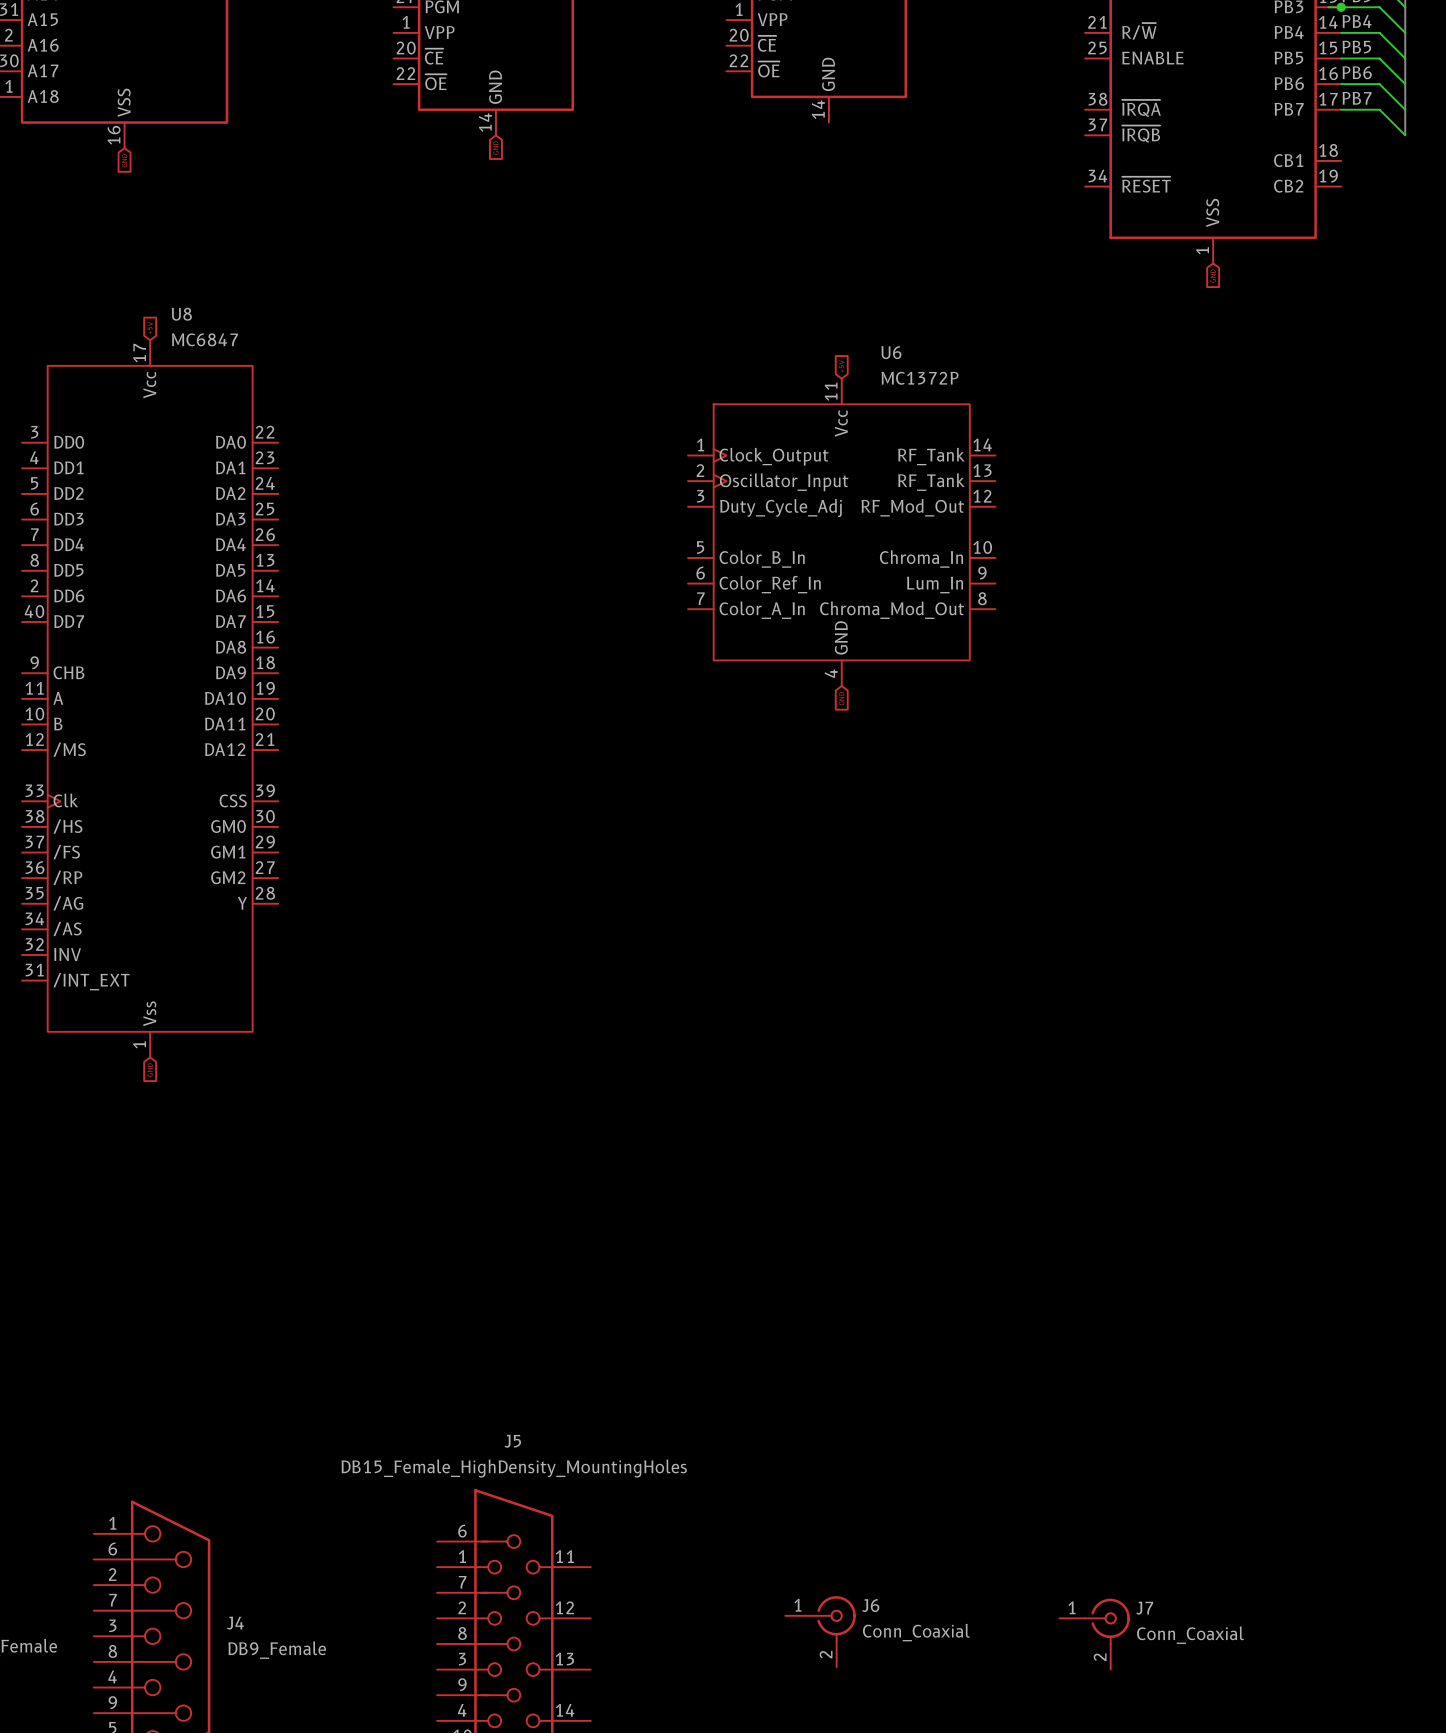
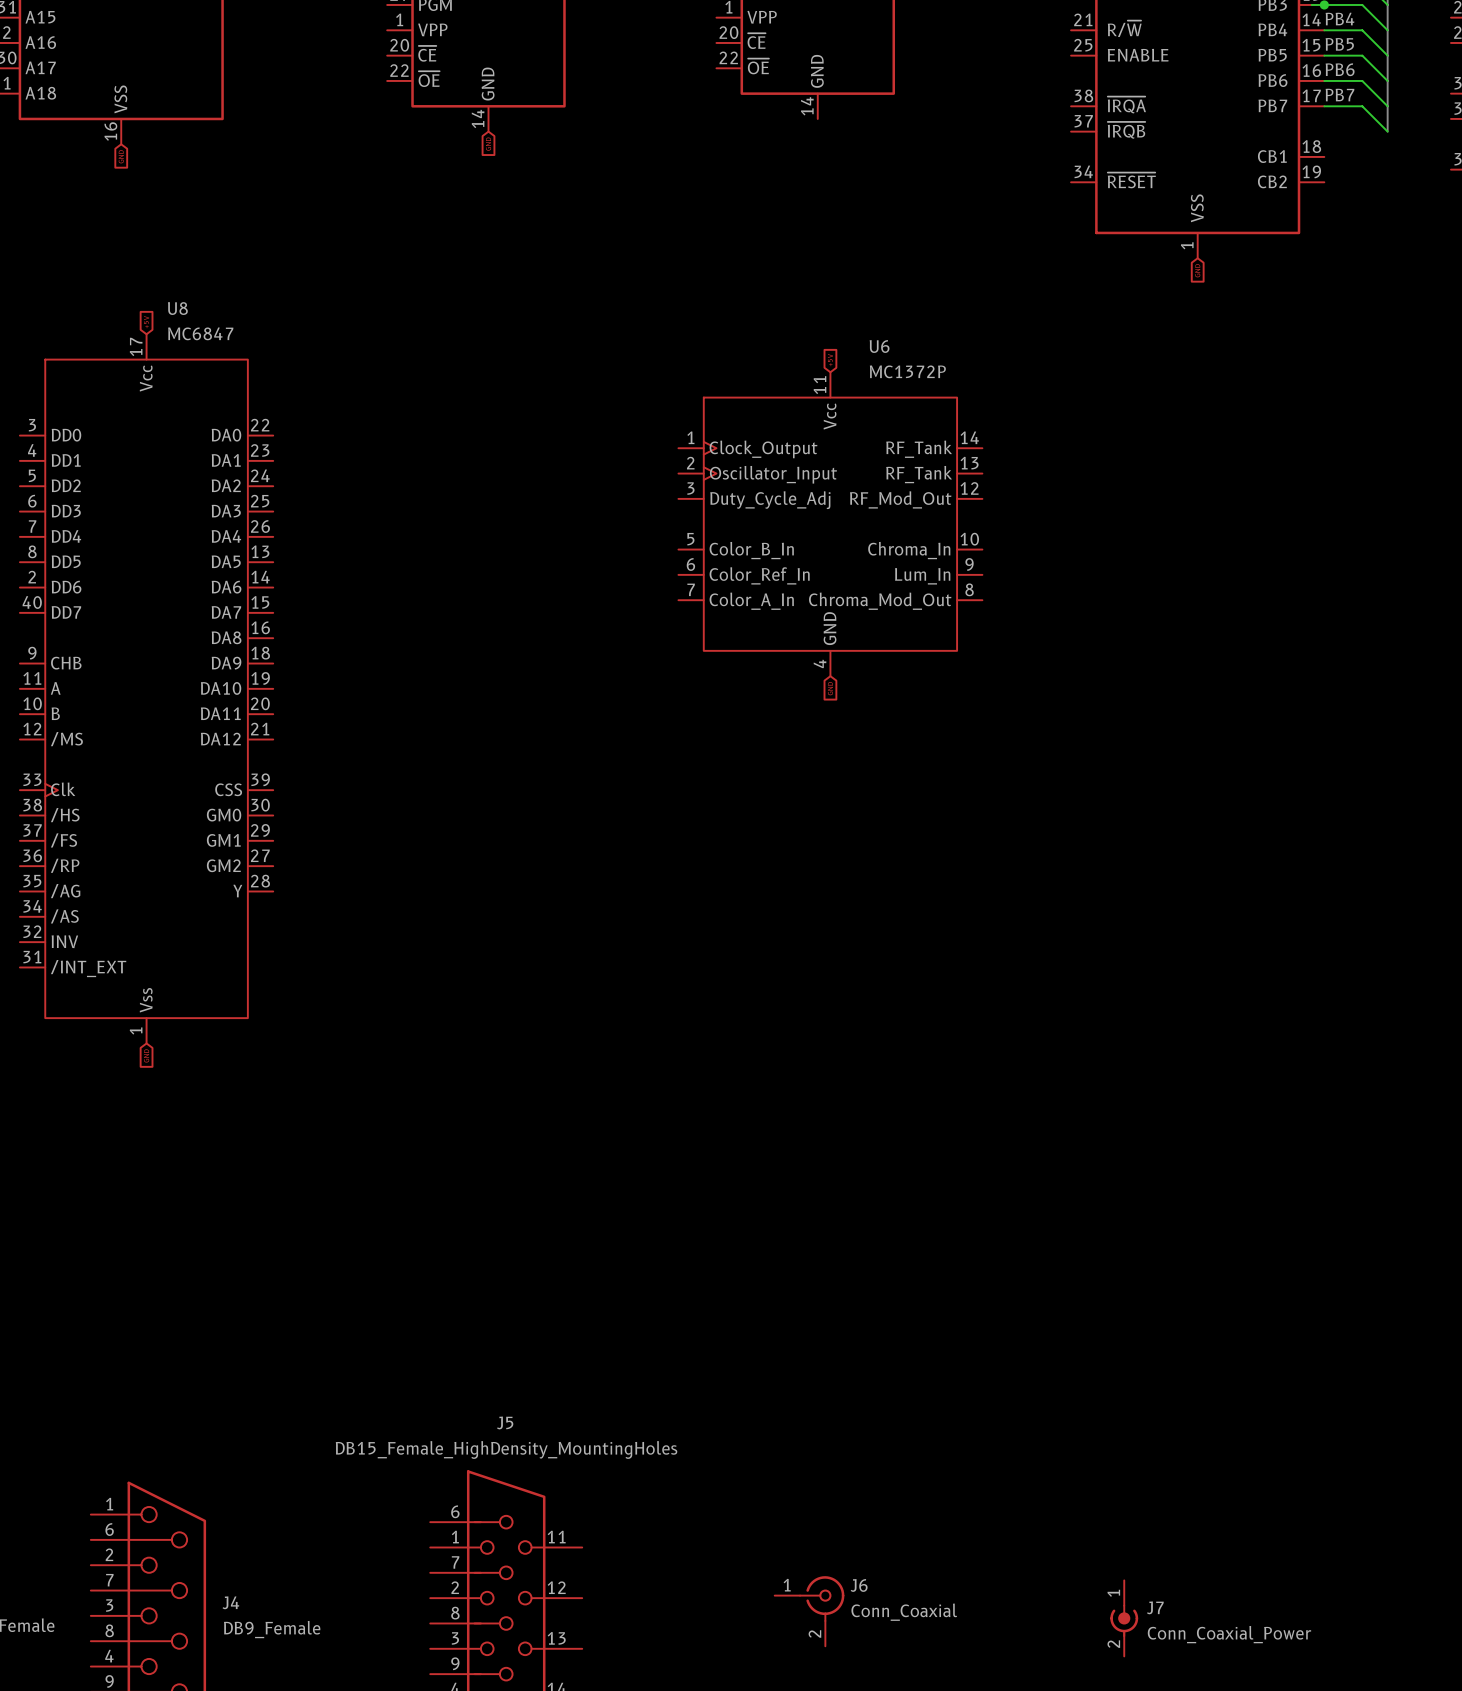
J7 symbol: [1059, 1598, 1130, 1670] -> [1110, 1580, 1139, 1657]
J7 name position: J7 (1144, 1608) -> J7 (1155, 1607)
J7 value: Conn_Coaxial (1190, 1635) -> Conn_Coaxial_Power (1229, 1634)

